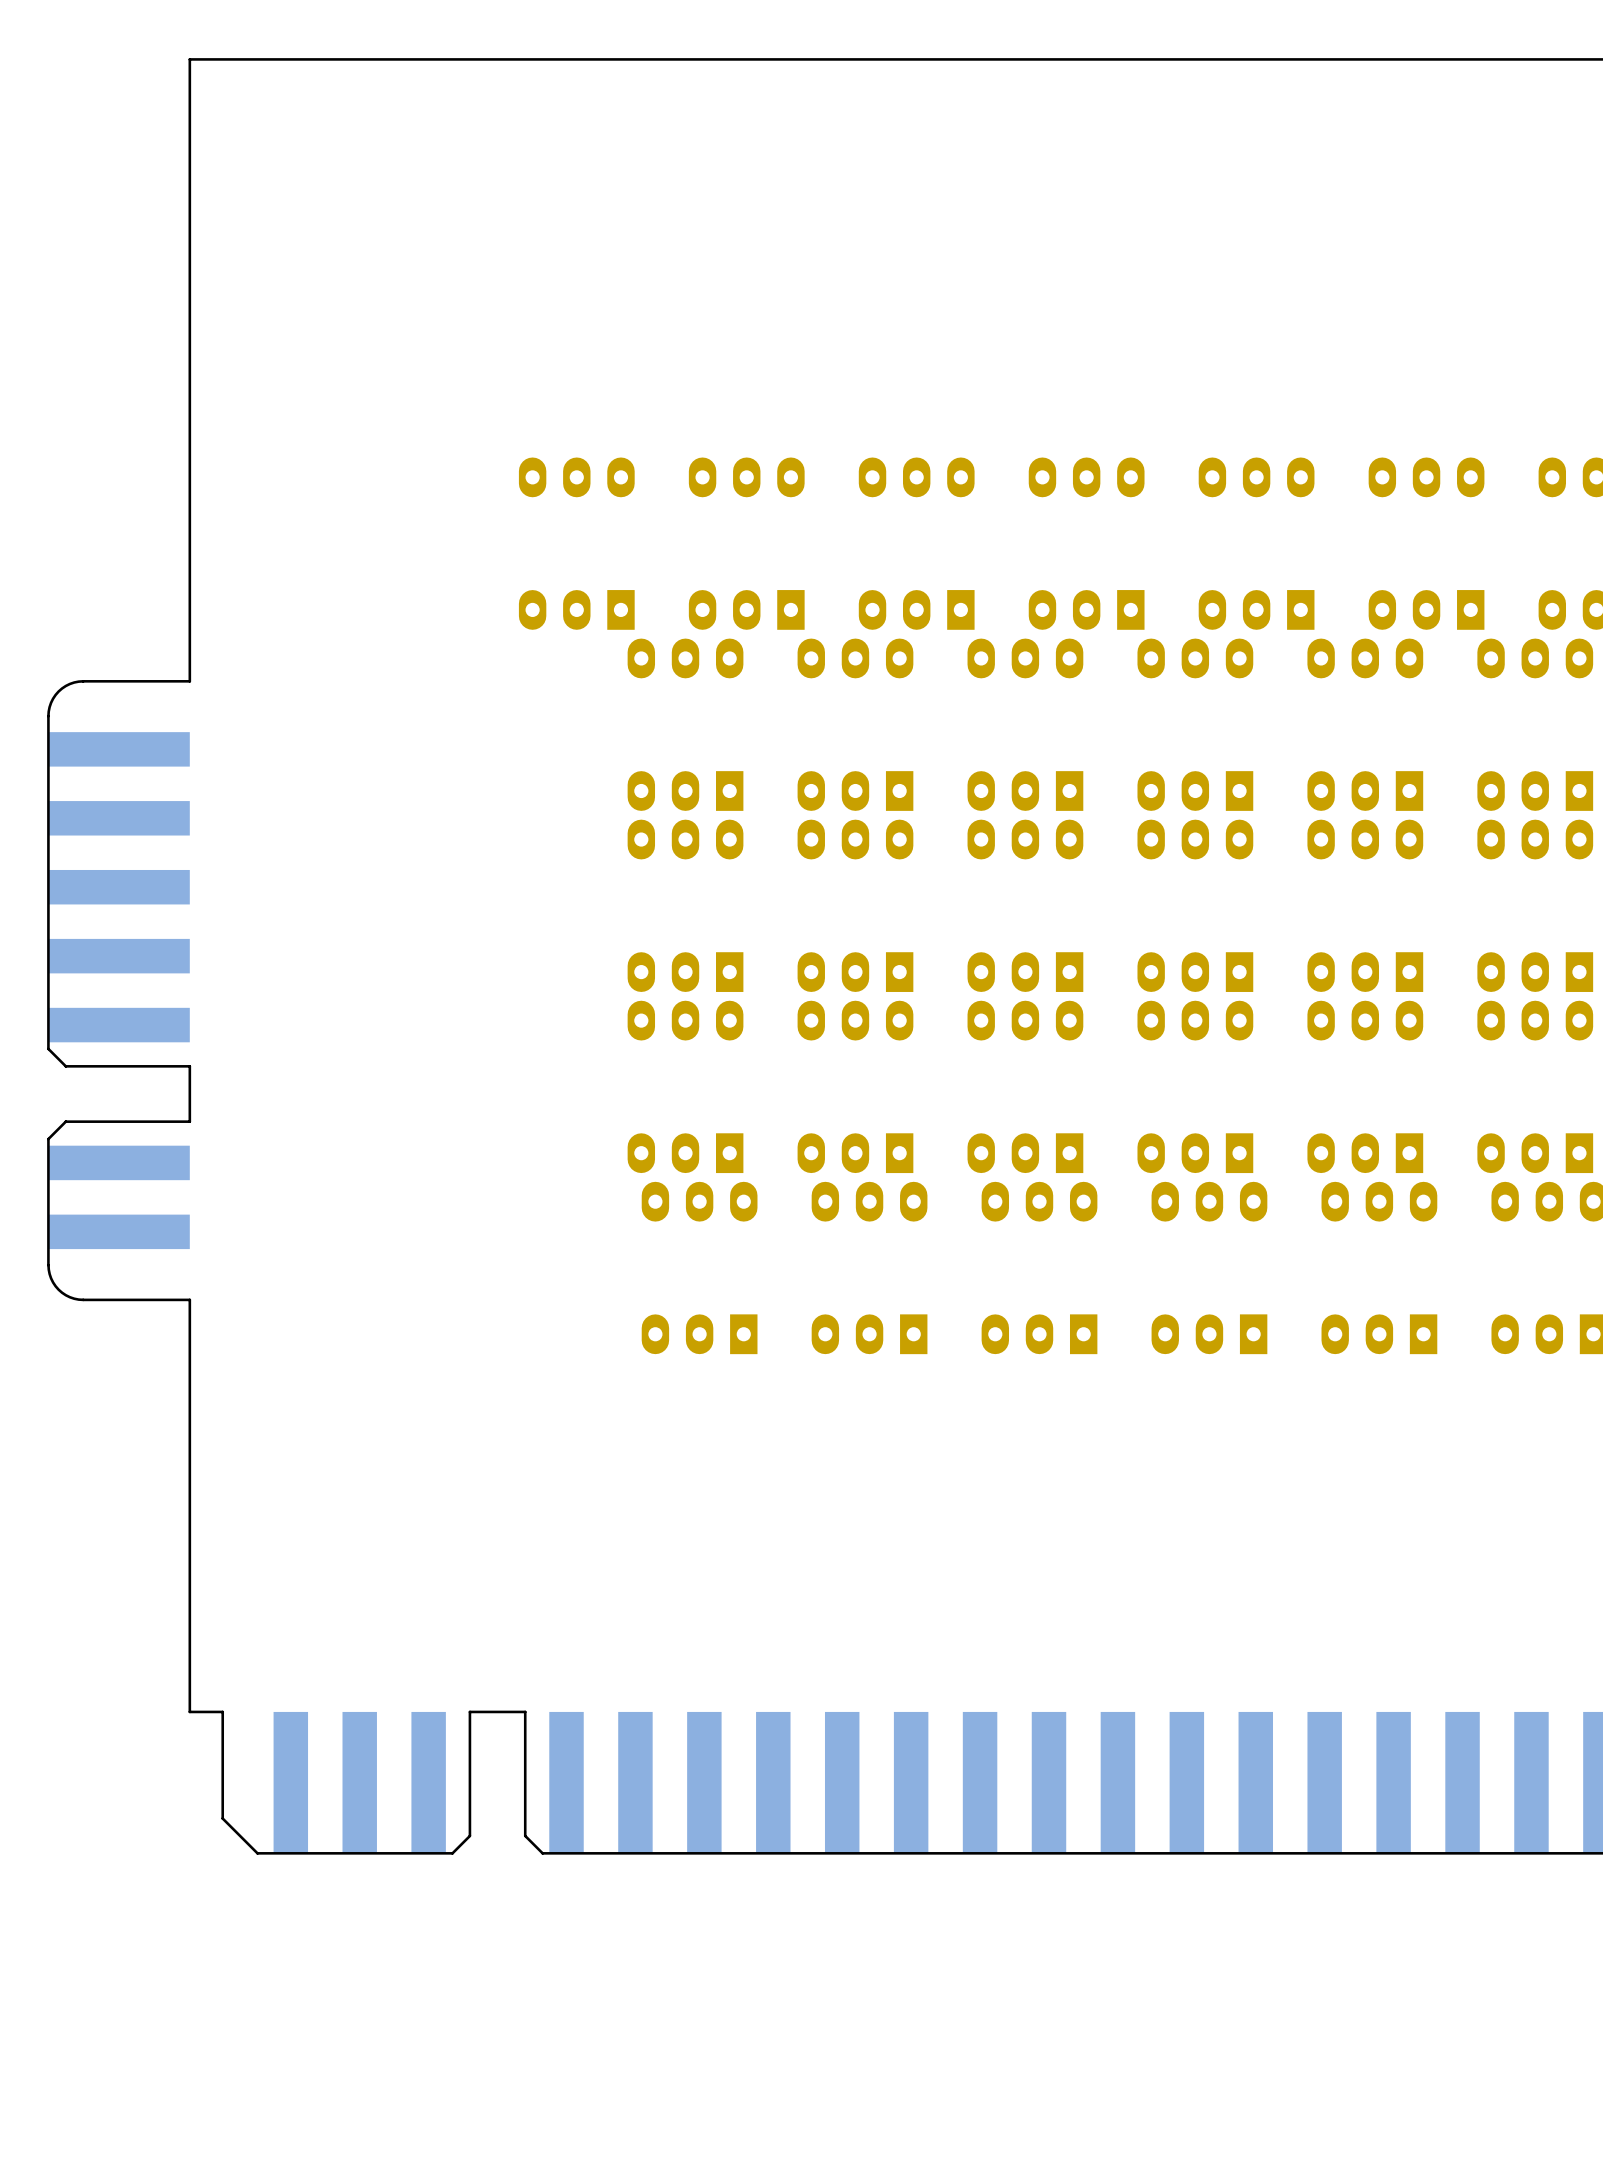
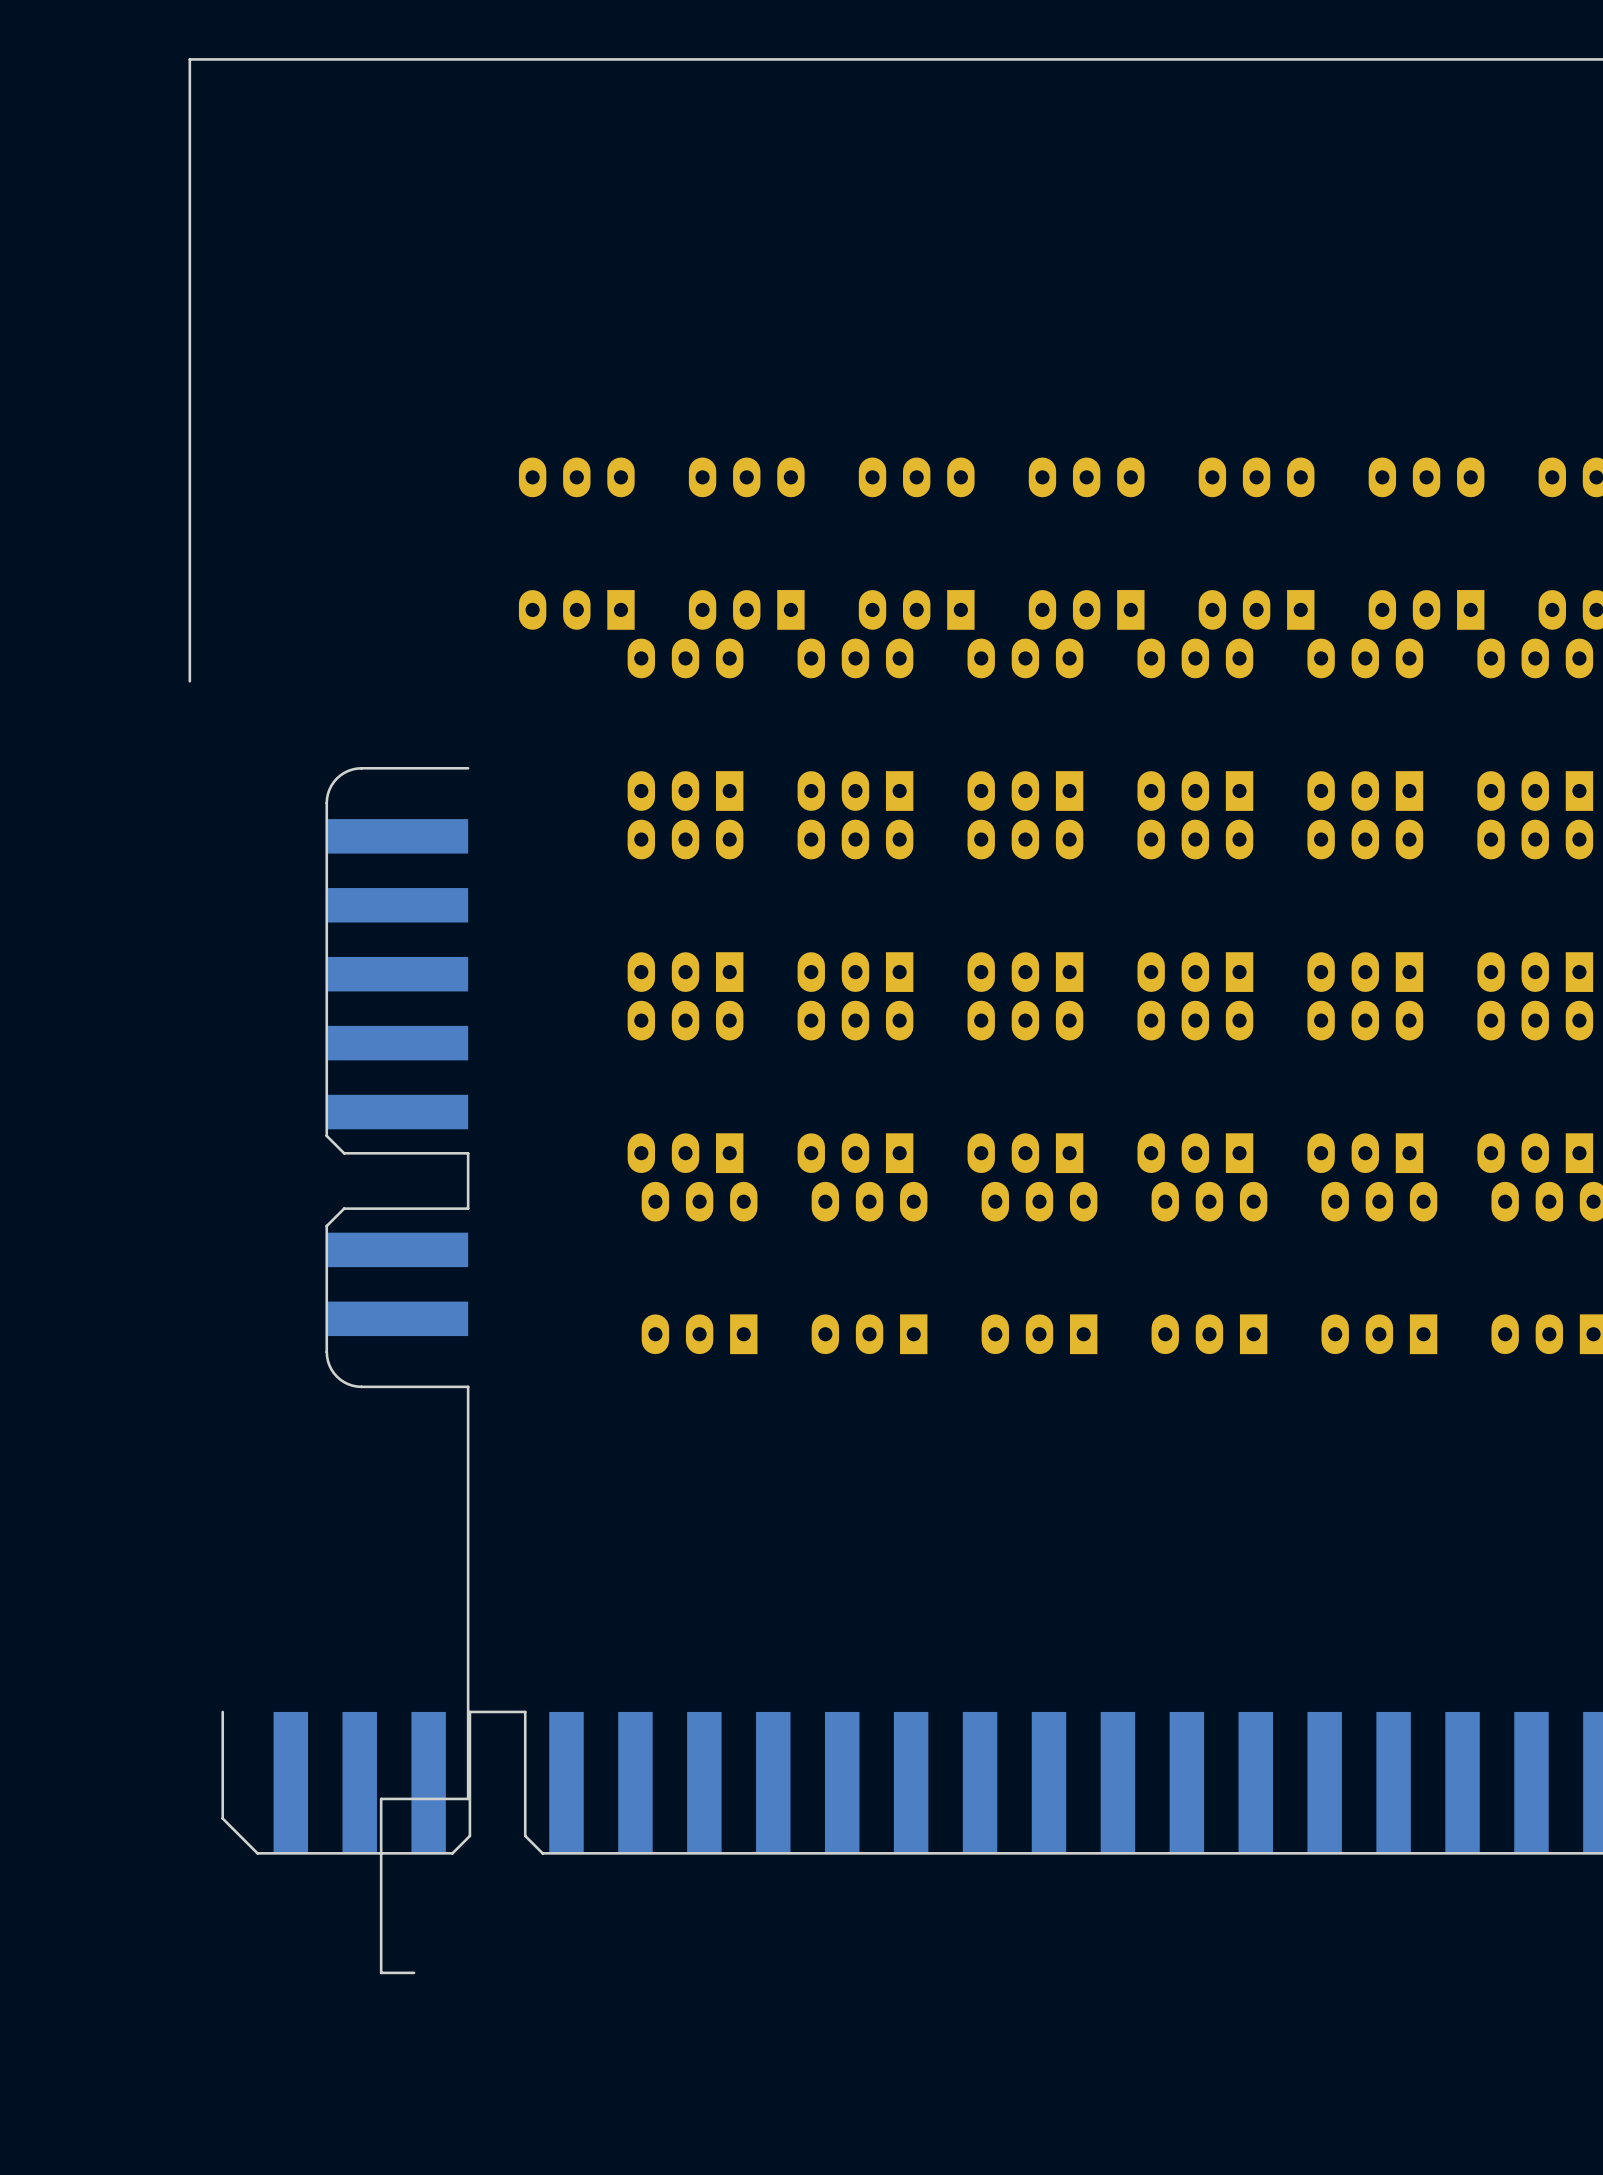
part position: (119, 990) -> (397, 1077)
board edge: (189, 1299) (189, 1711) (222, 1711) -> none
board edge: none -> (468, 1386) (468, 1798) (381, 1798) (381, 1972) (414, 1972)

